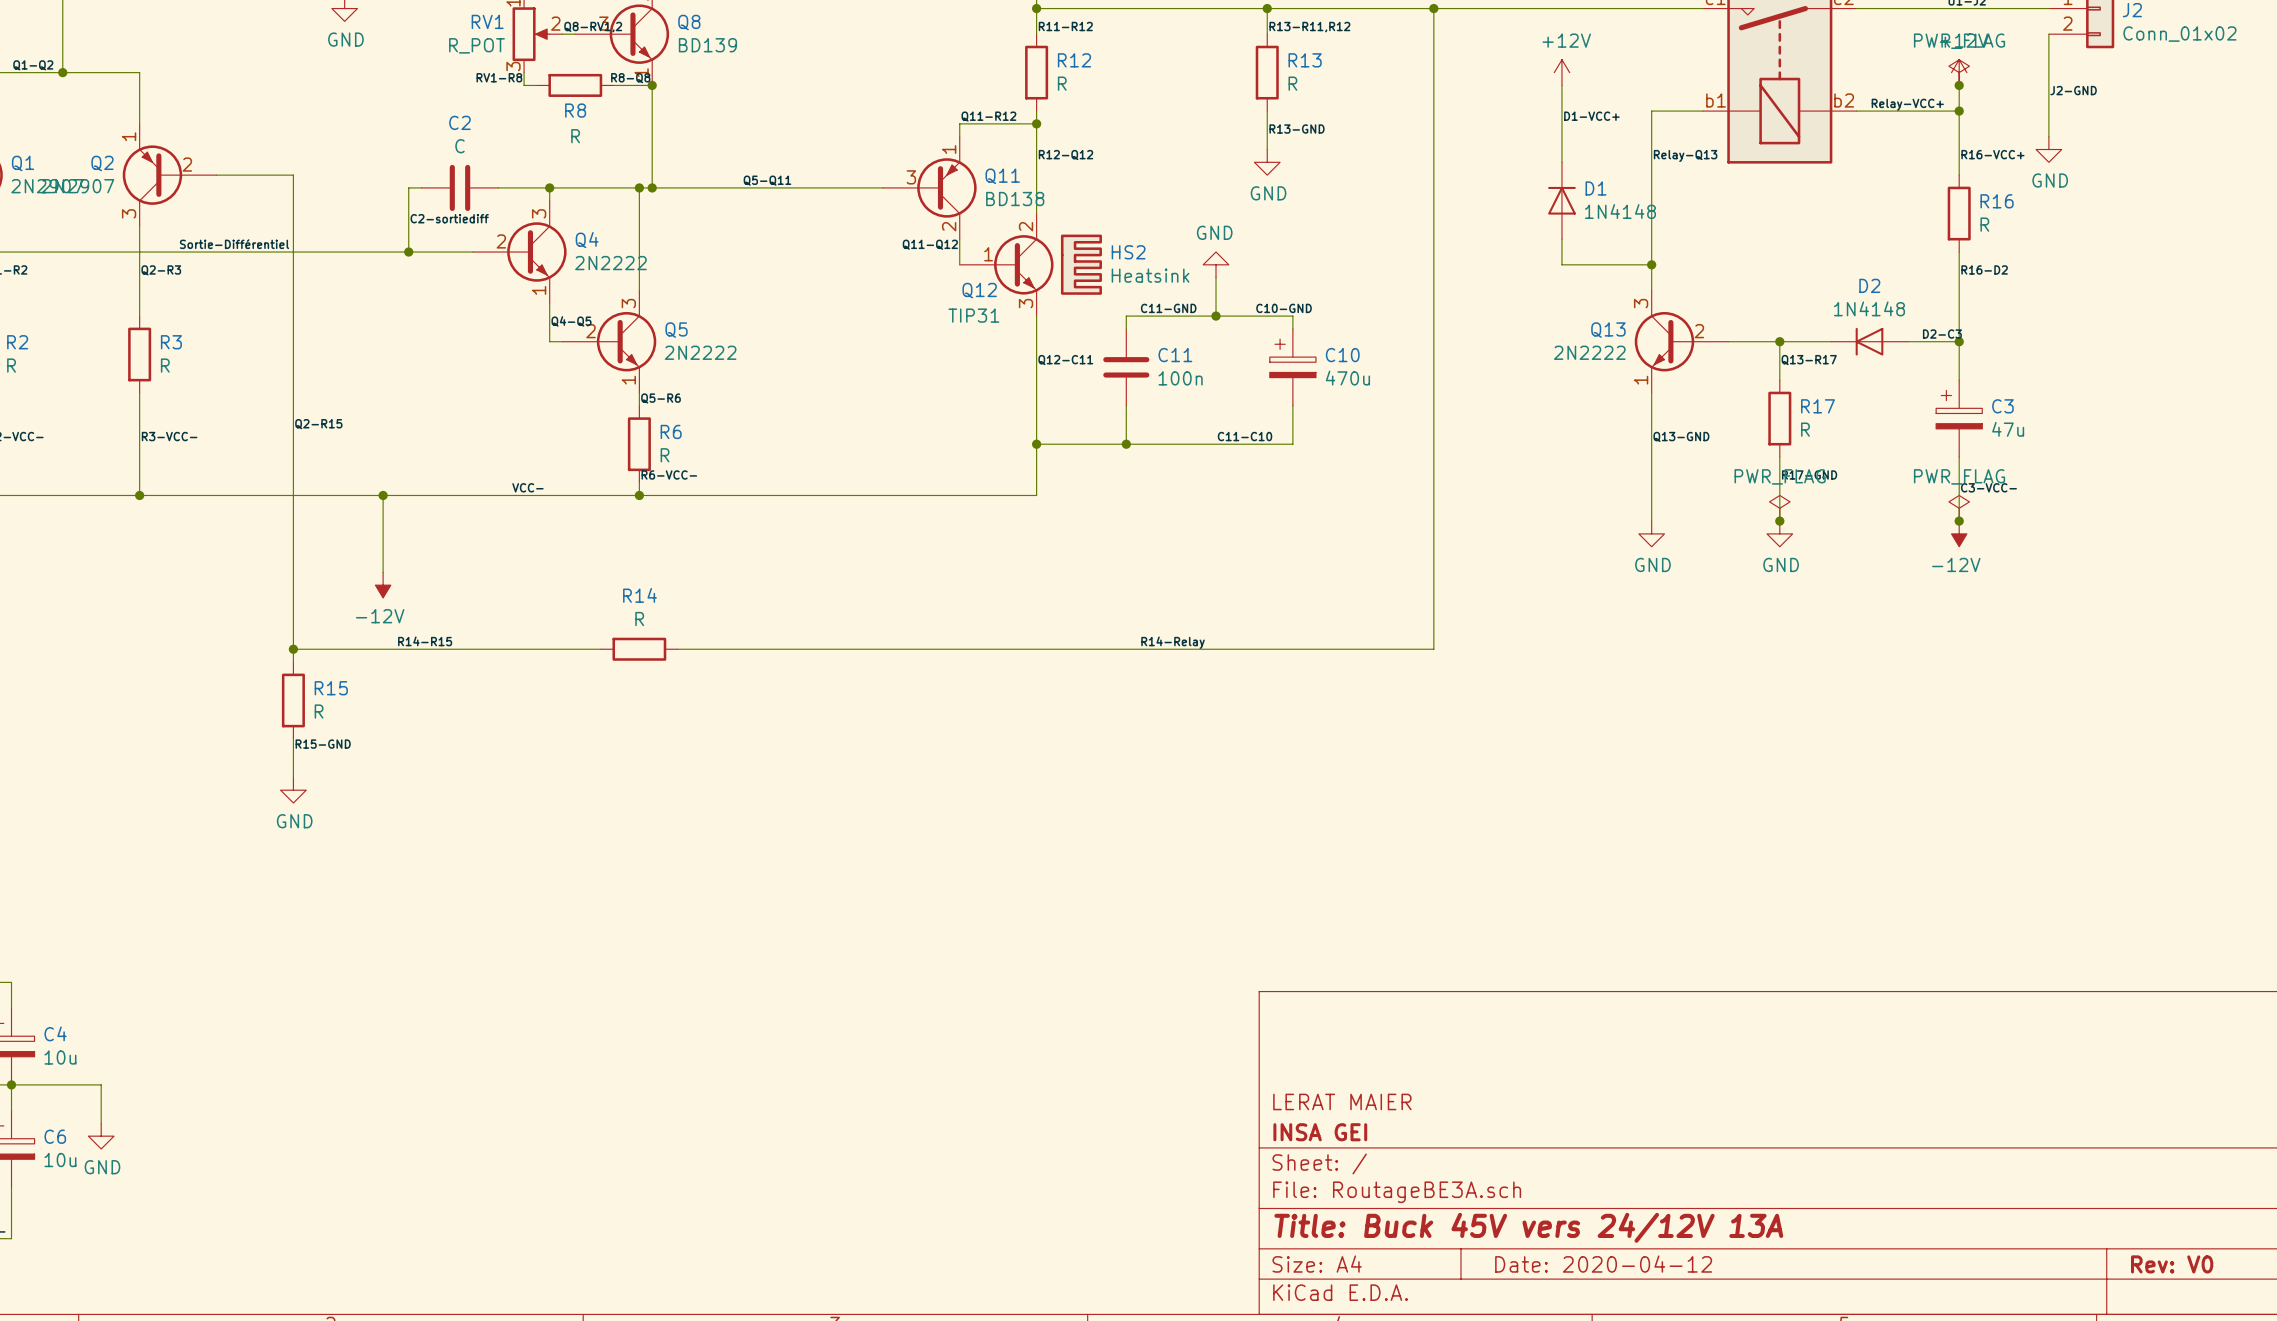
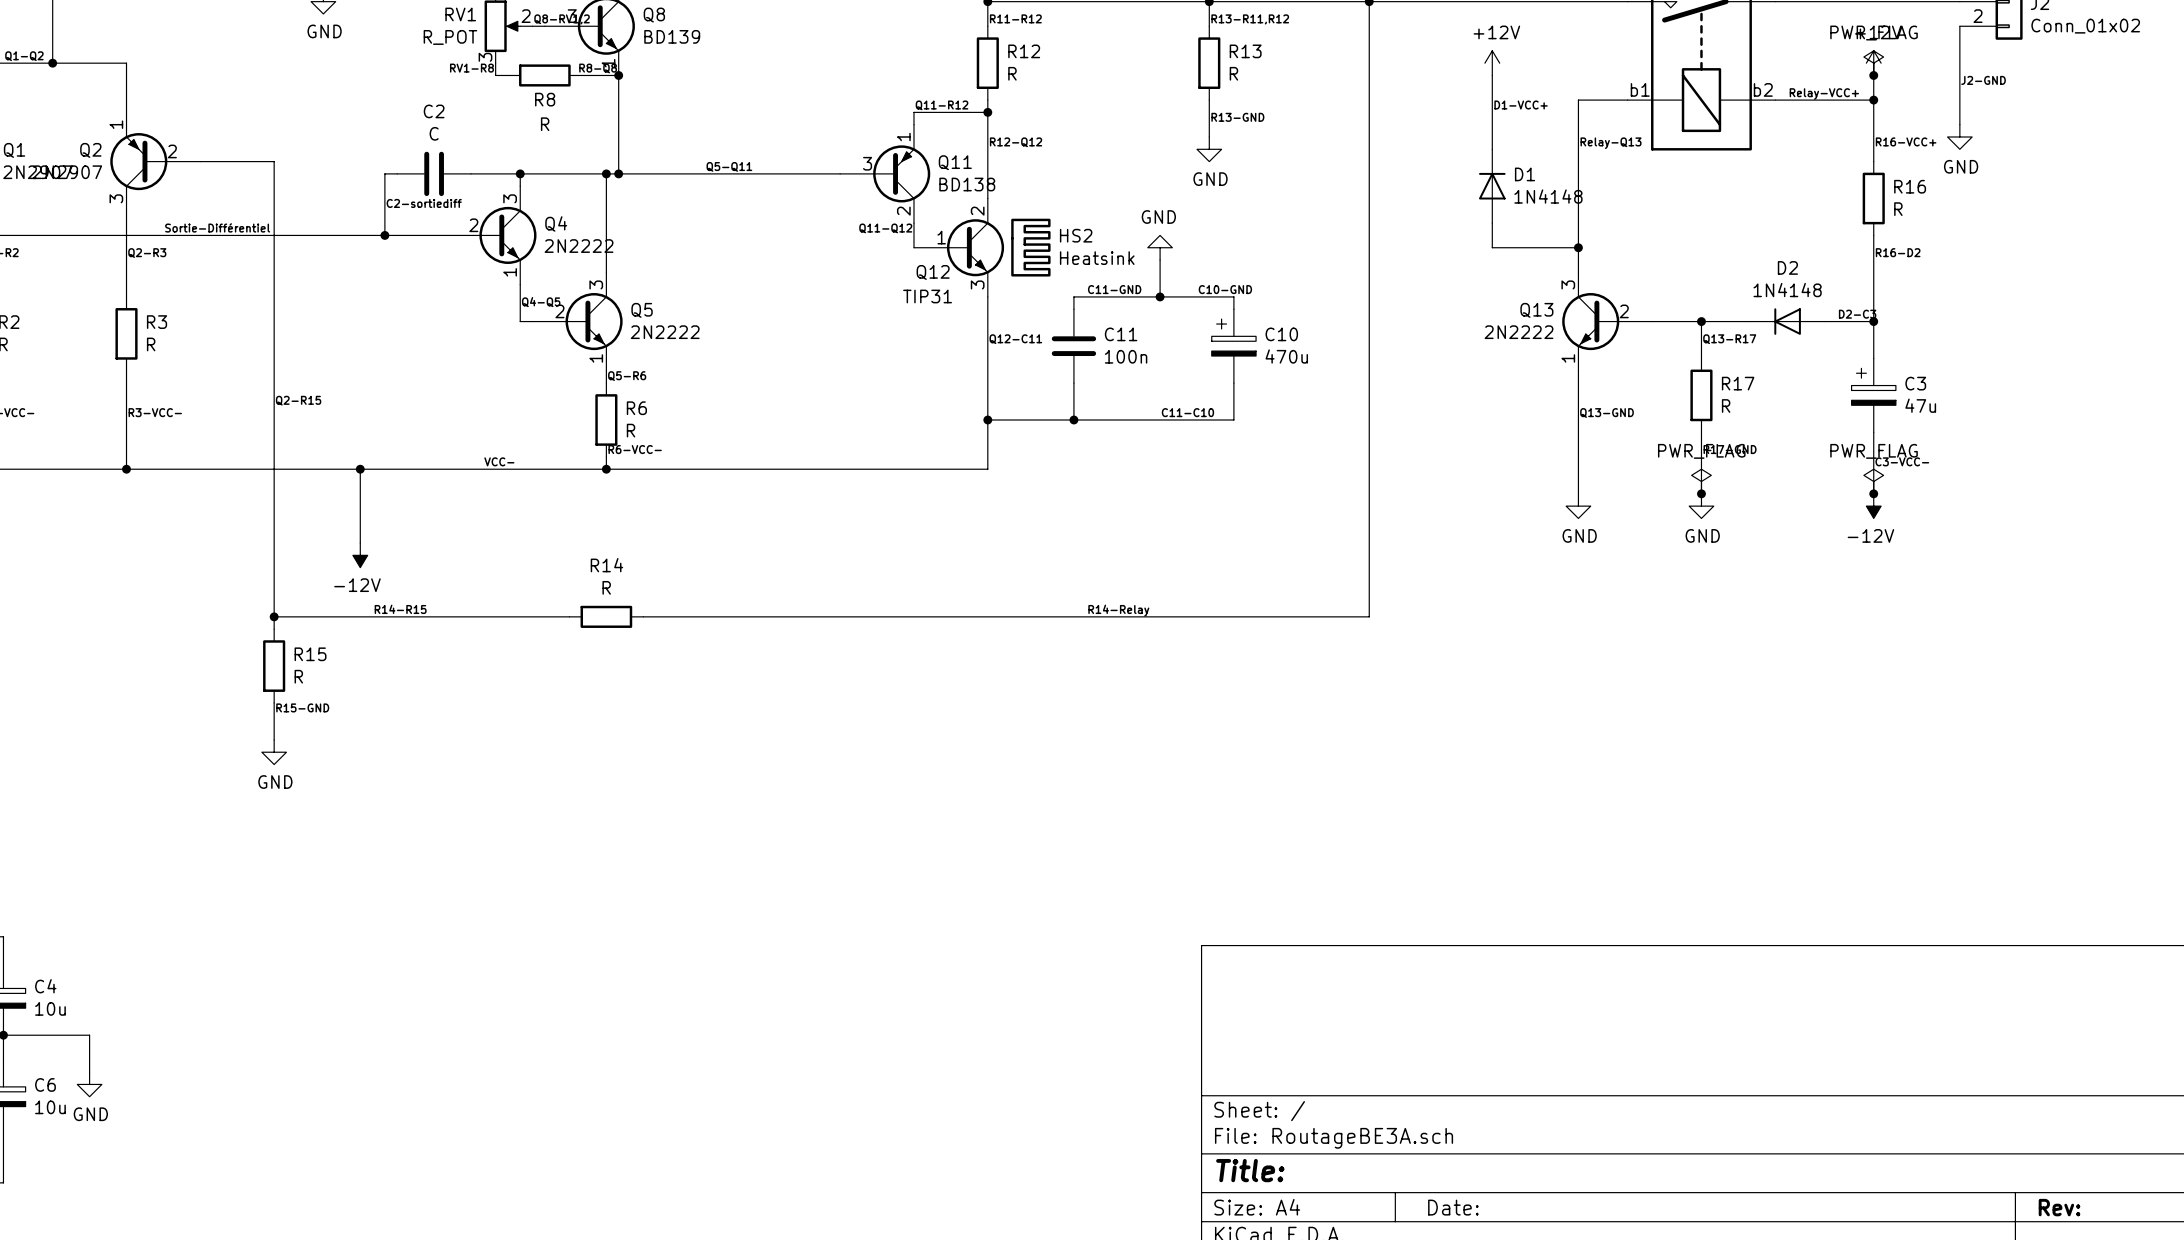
title block: LERAT MAIER (1342, 1101) -> none
title block: INSA GEI (1320, 1132) -> none
title block: Title: Buck 45V vers 24/12V 13A (1528, 1227) -> Title: (1250, 1170)
title block: Date: 2020-04-12 (1603, 1264) -> Date: (1453, 1207)
title block: Rev: V0 (2172, 1264) -> Rev: (2059, 1207)

